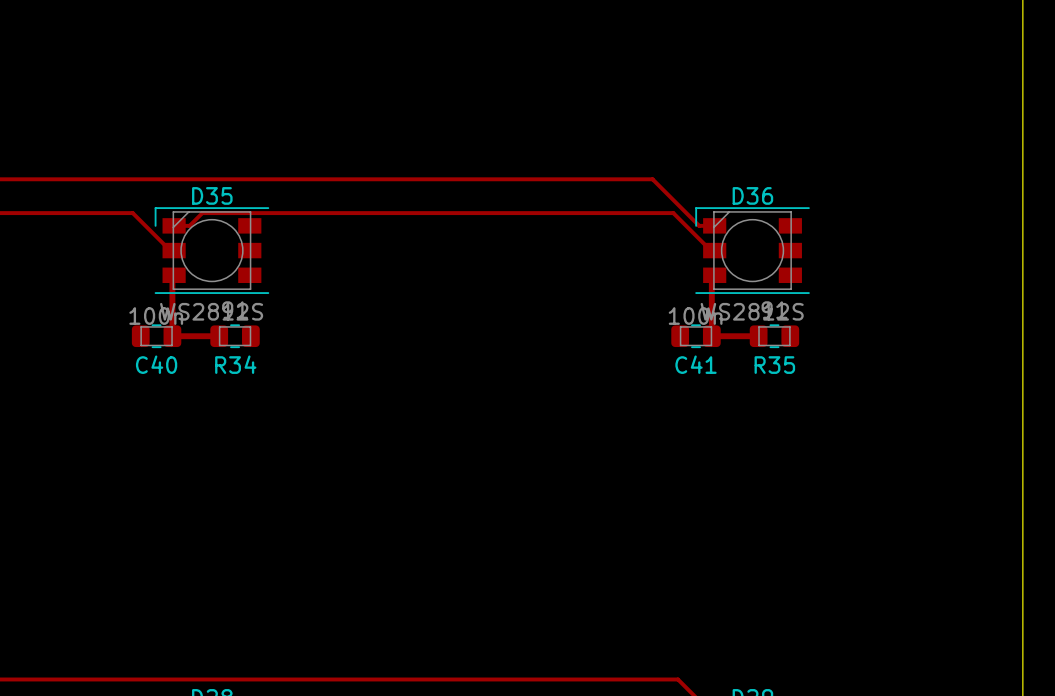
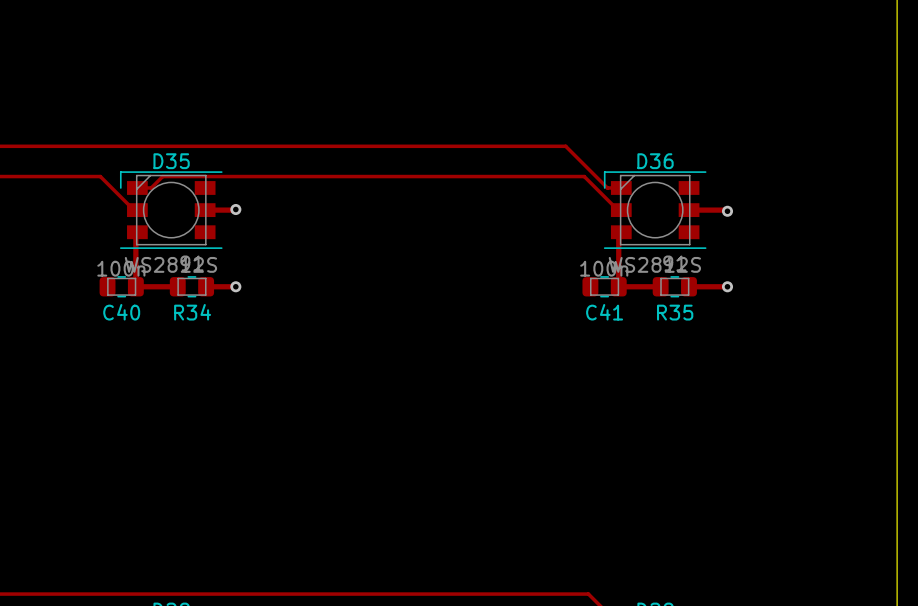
track: none -> (235, 209) (205, 210)
via: none -> (235, 209)
track: none -> (689, 210) (727, 211)
via: none -> (727, 211)
track: none -> (207, 286) (235, 286)
via: none -> (235, 286)
track: none -> (692, 286) (727, 286)
via: none -> (727, 286)

